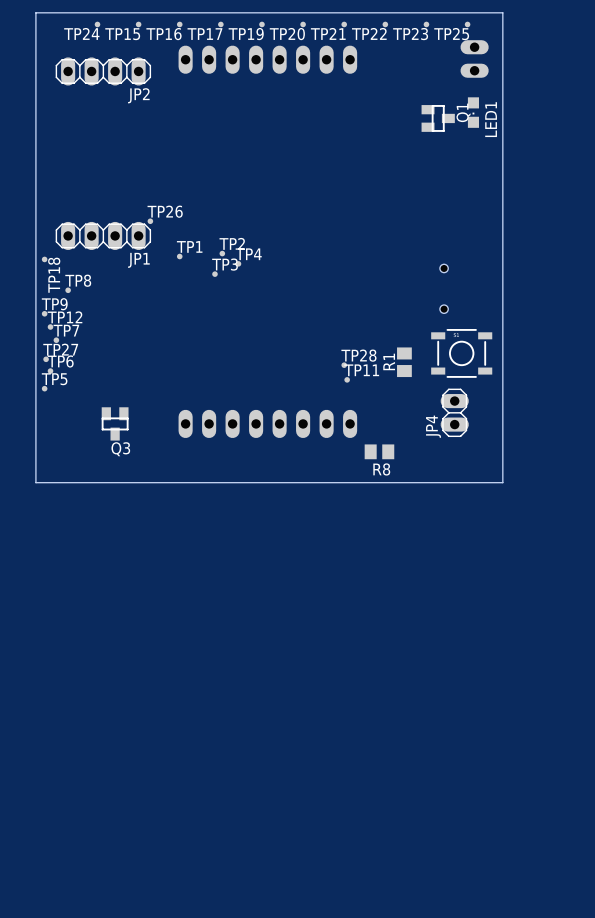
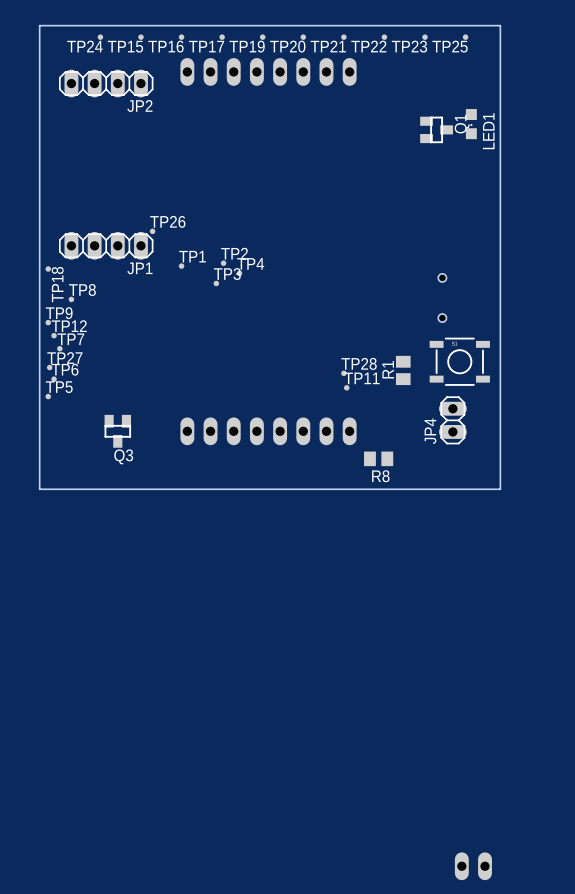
part: (474, 58) -> none
part: none -> (473, 866)

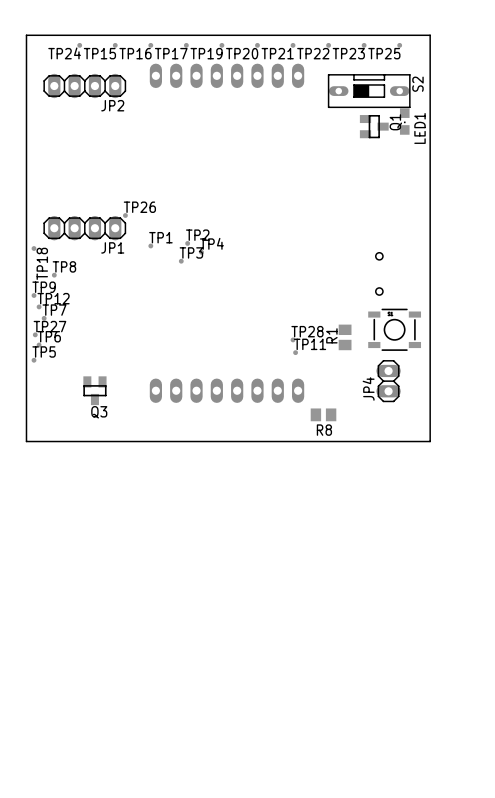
S2: none -> (369, 91)
part: (473, 866) -> none

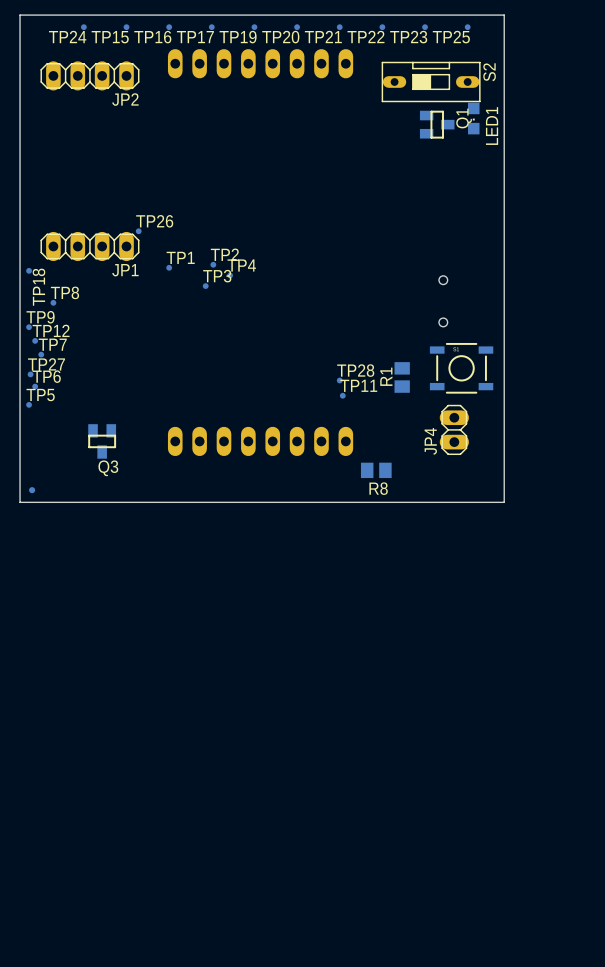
part: none -> (32, 490)

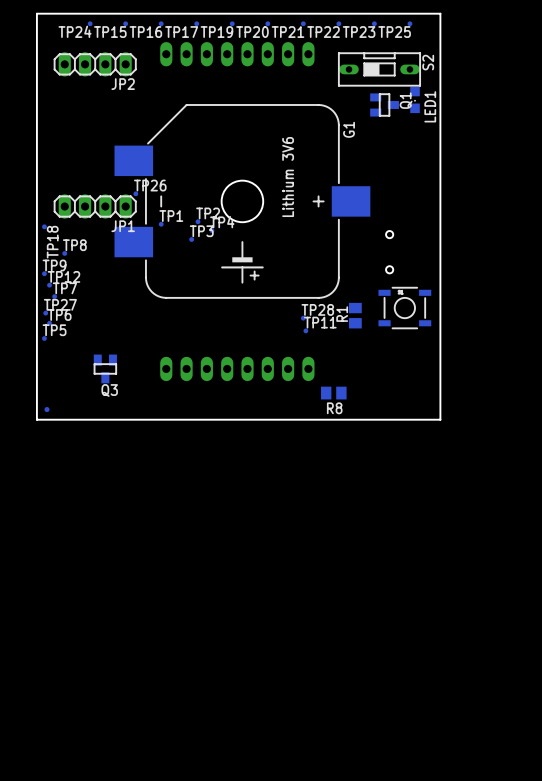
G1: none -> (242, 201)
JP4: (454, 429) -> none

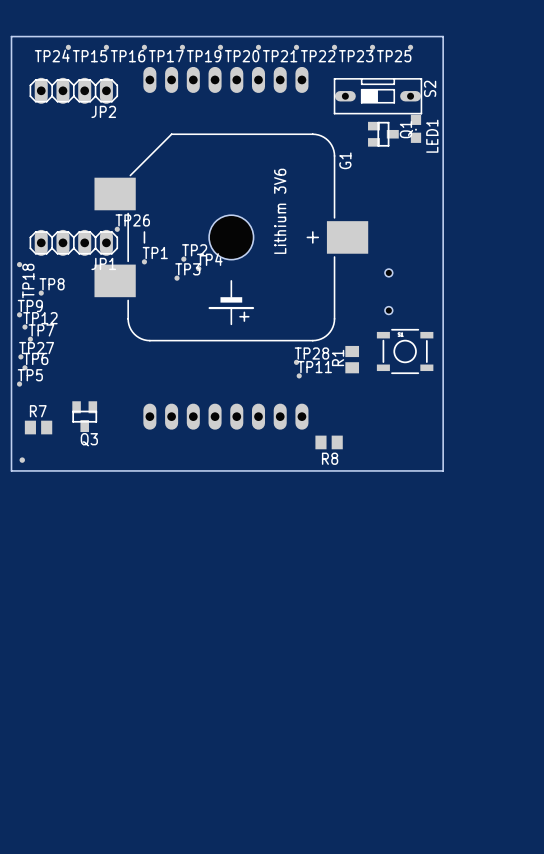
R7: none -> (38, 427)

